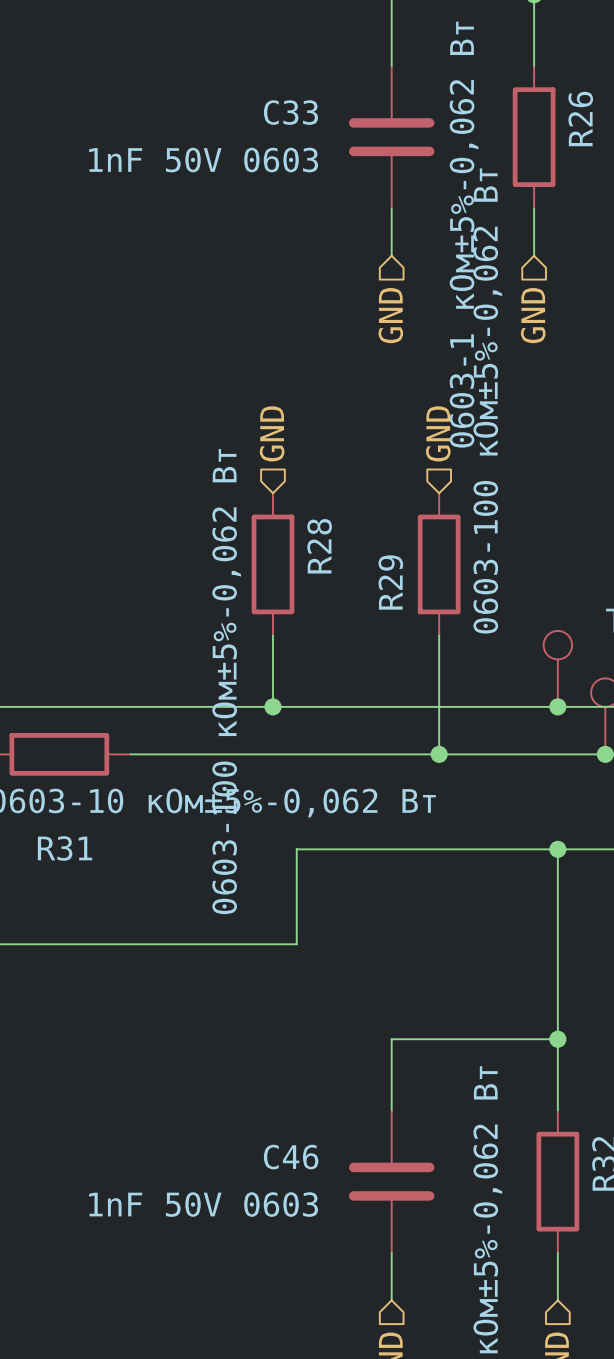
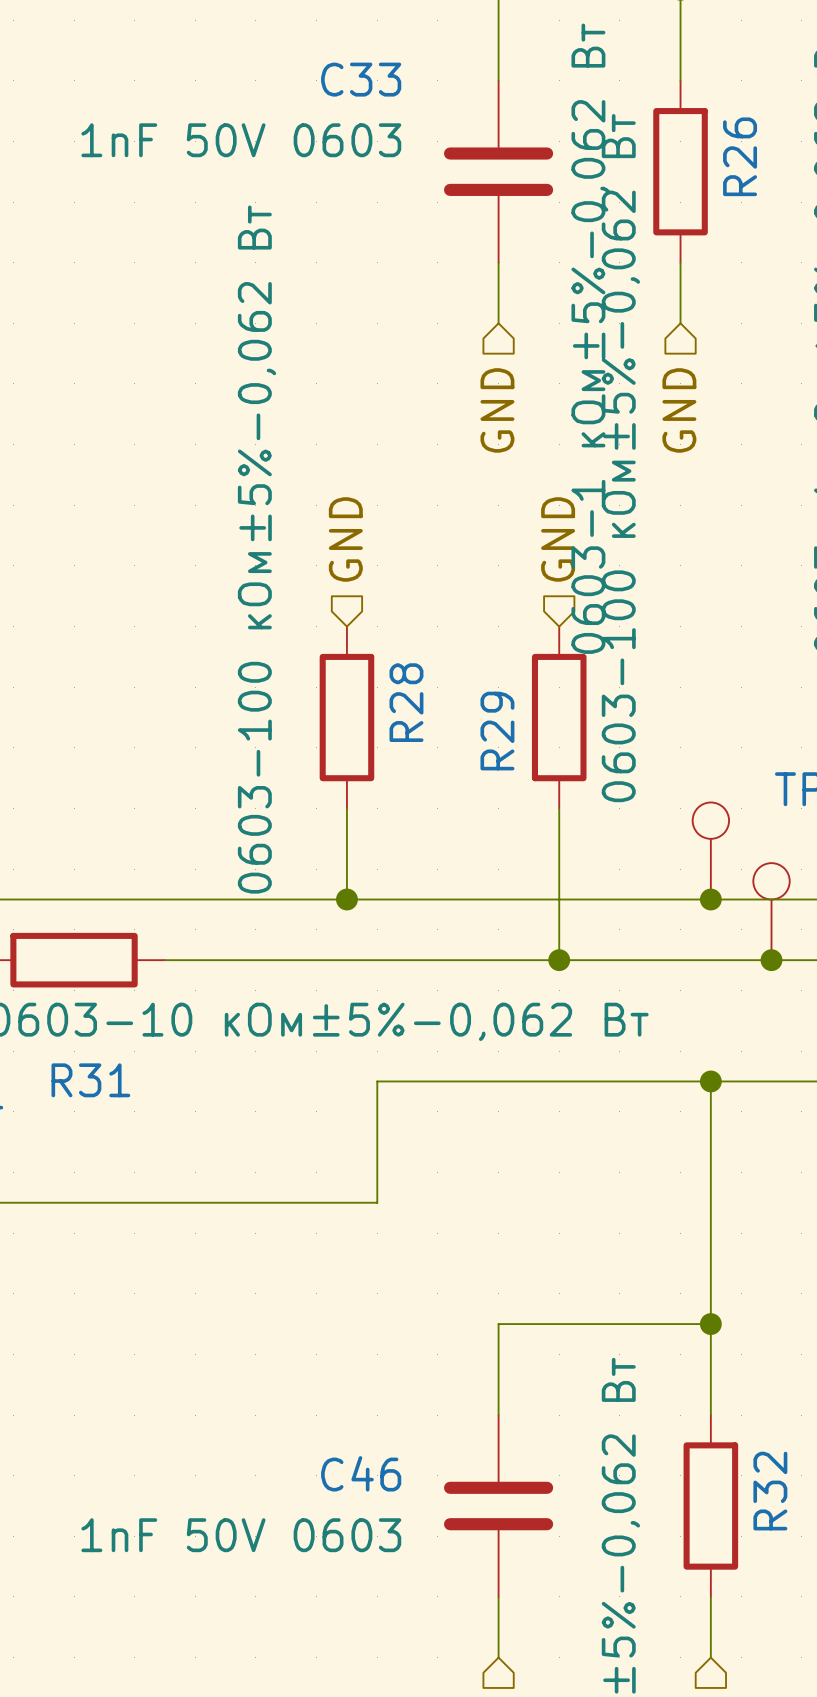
C33 name position: C33 (290, 112) -> C33 (361, 79)
C33 value position: 1nF 50V 0603 (203, 160) -> 1nF 50V 0603 (241, 140)
R28 value position: 0603-100 кОм±5%-0,062 Вт (226, 681) -> 0603-100 кОм±5%-0,062 Вт (257, 549)

